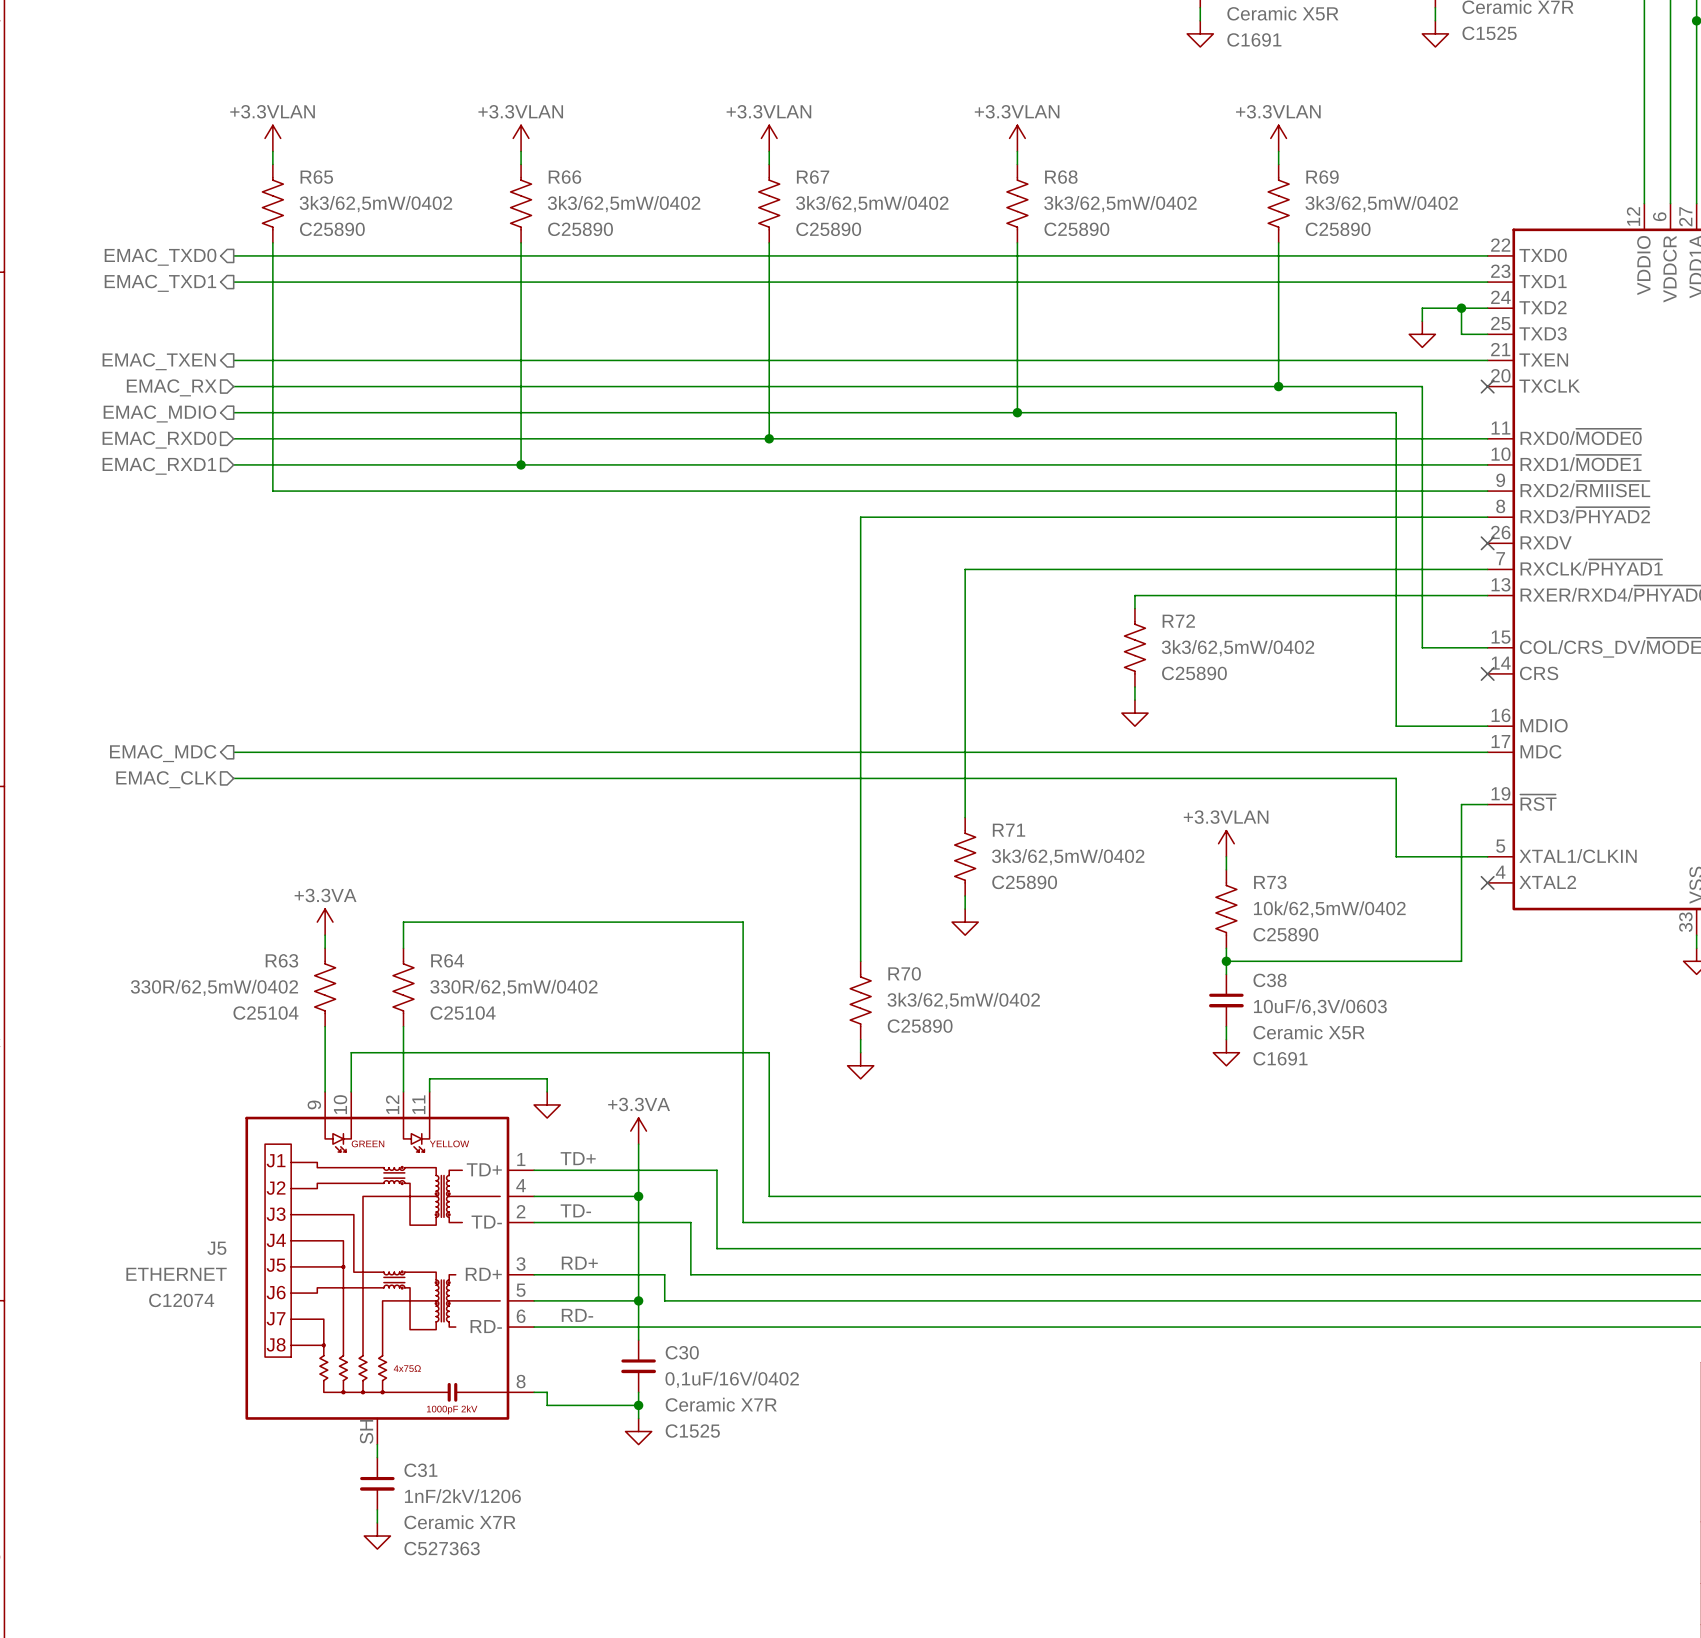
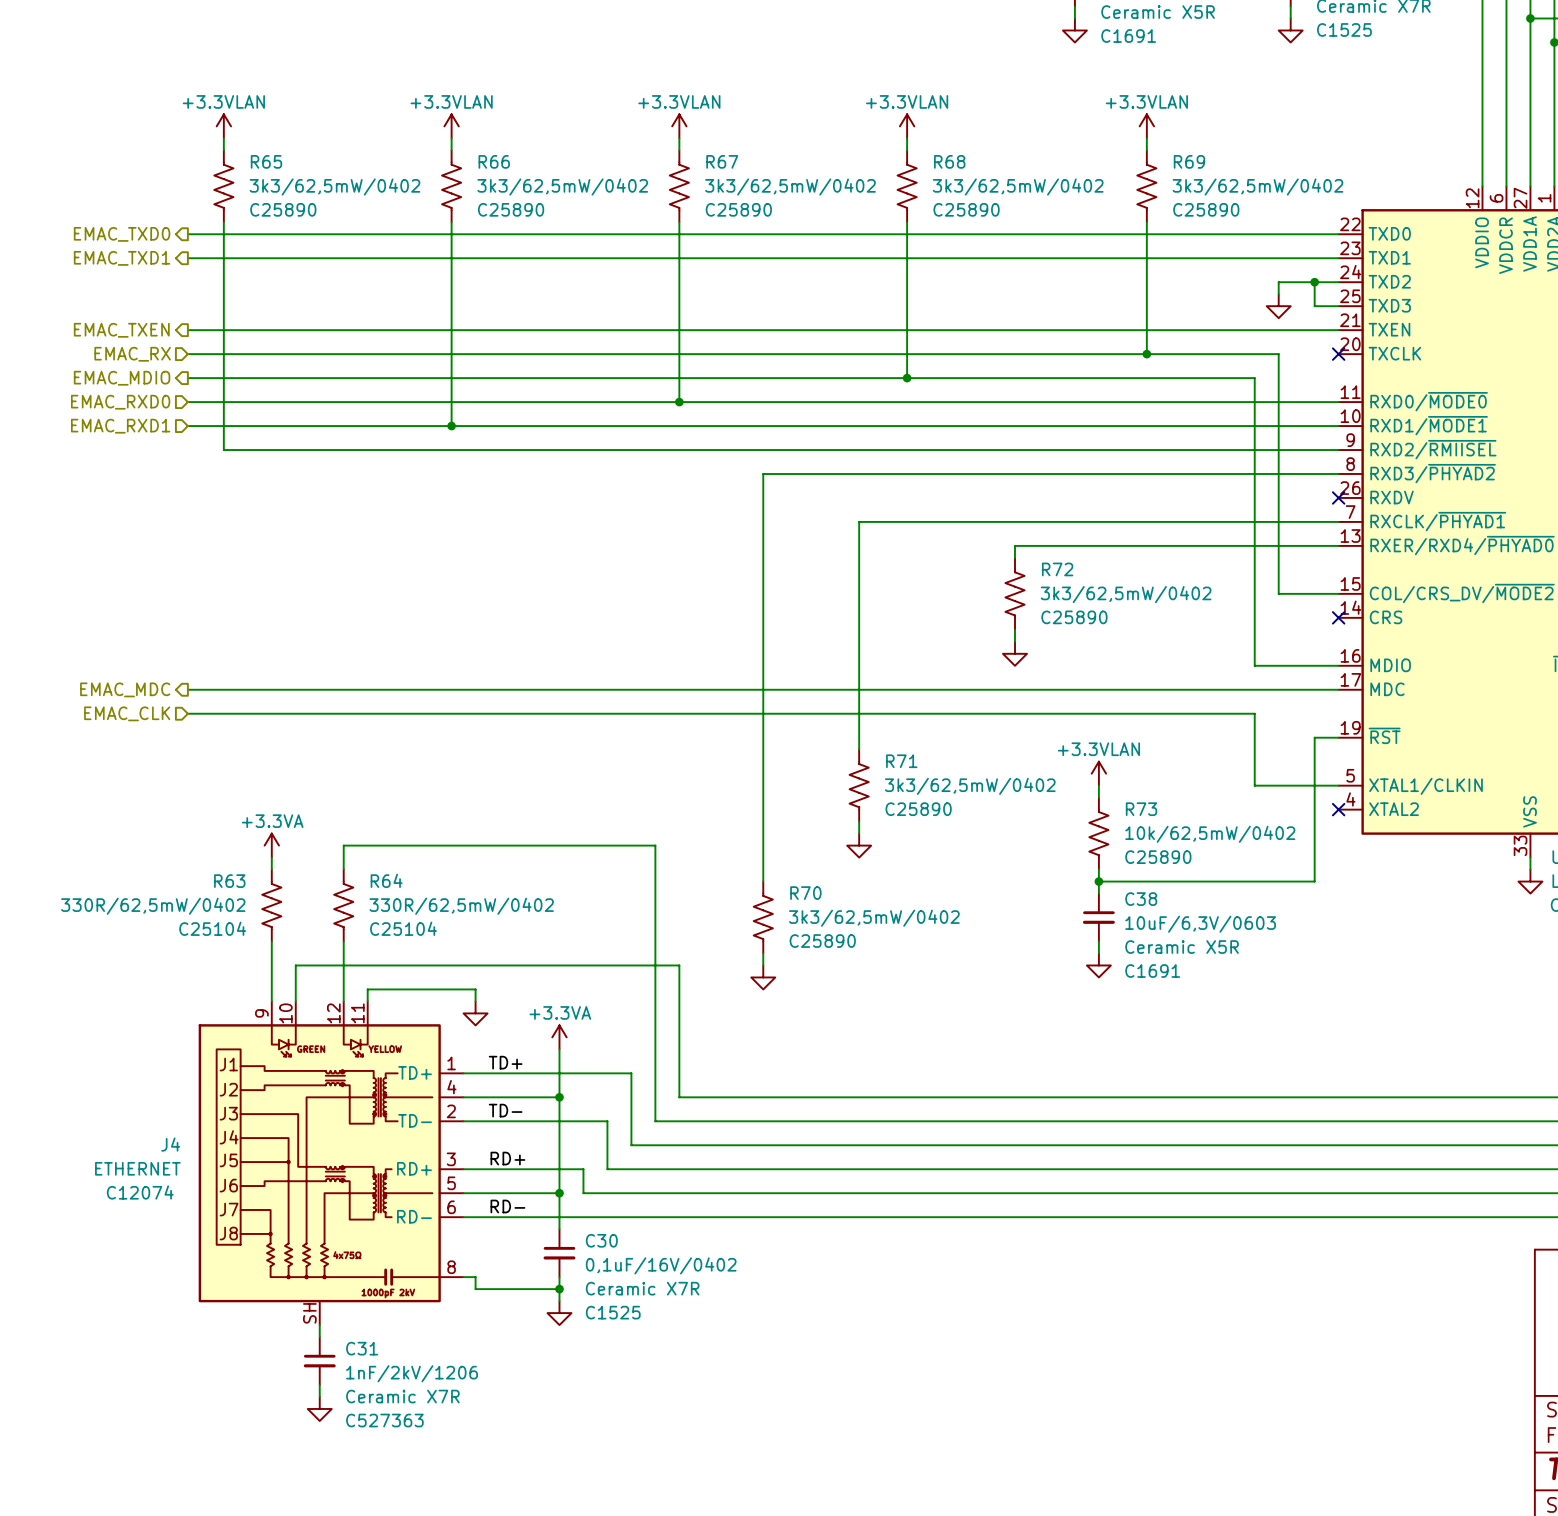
J5 name: J5 (216, 1248) -> J4 (170, 1144)

